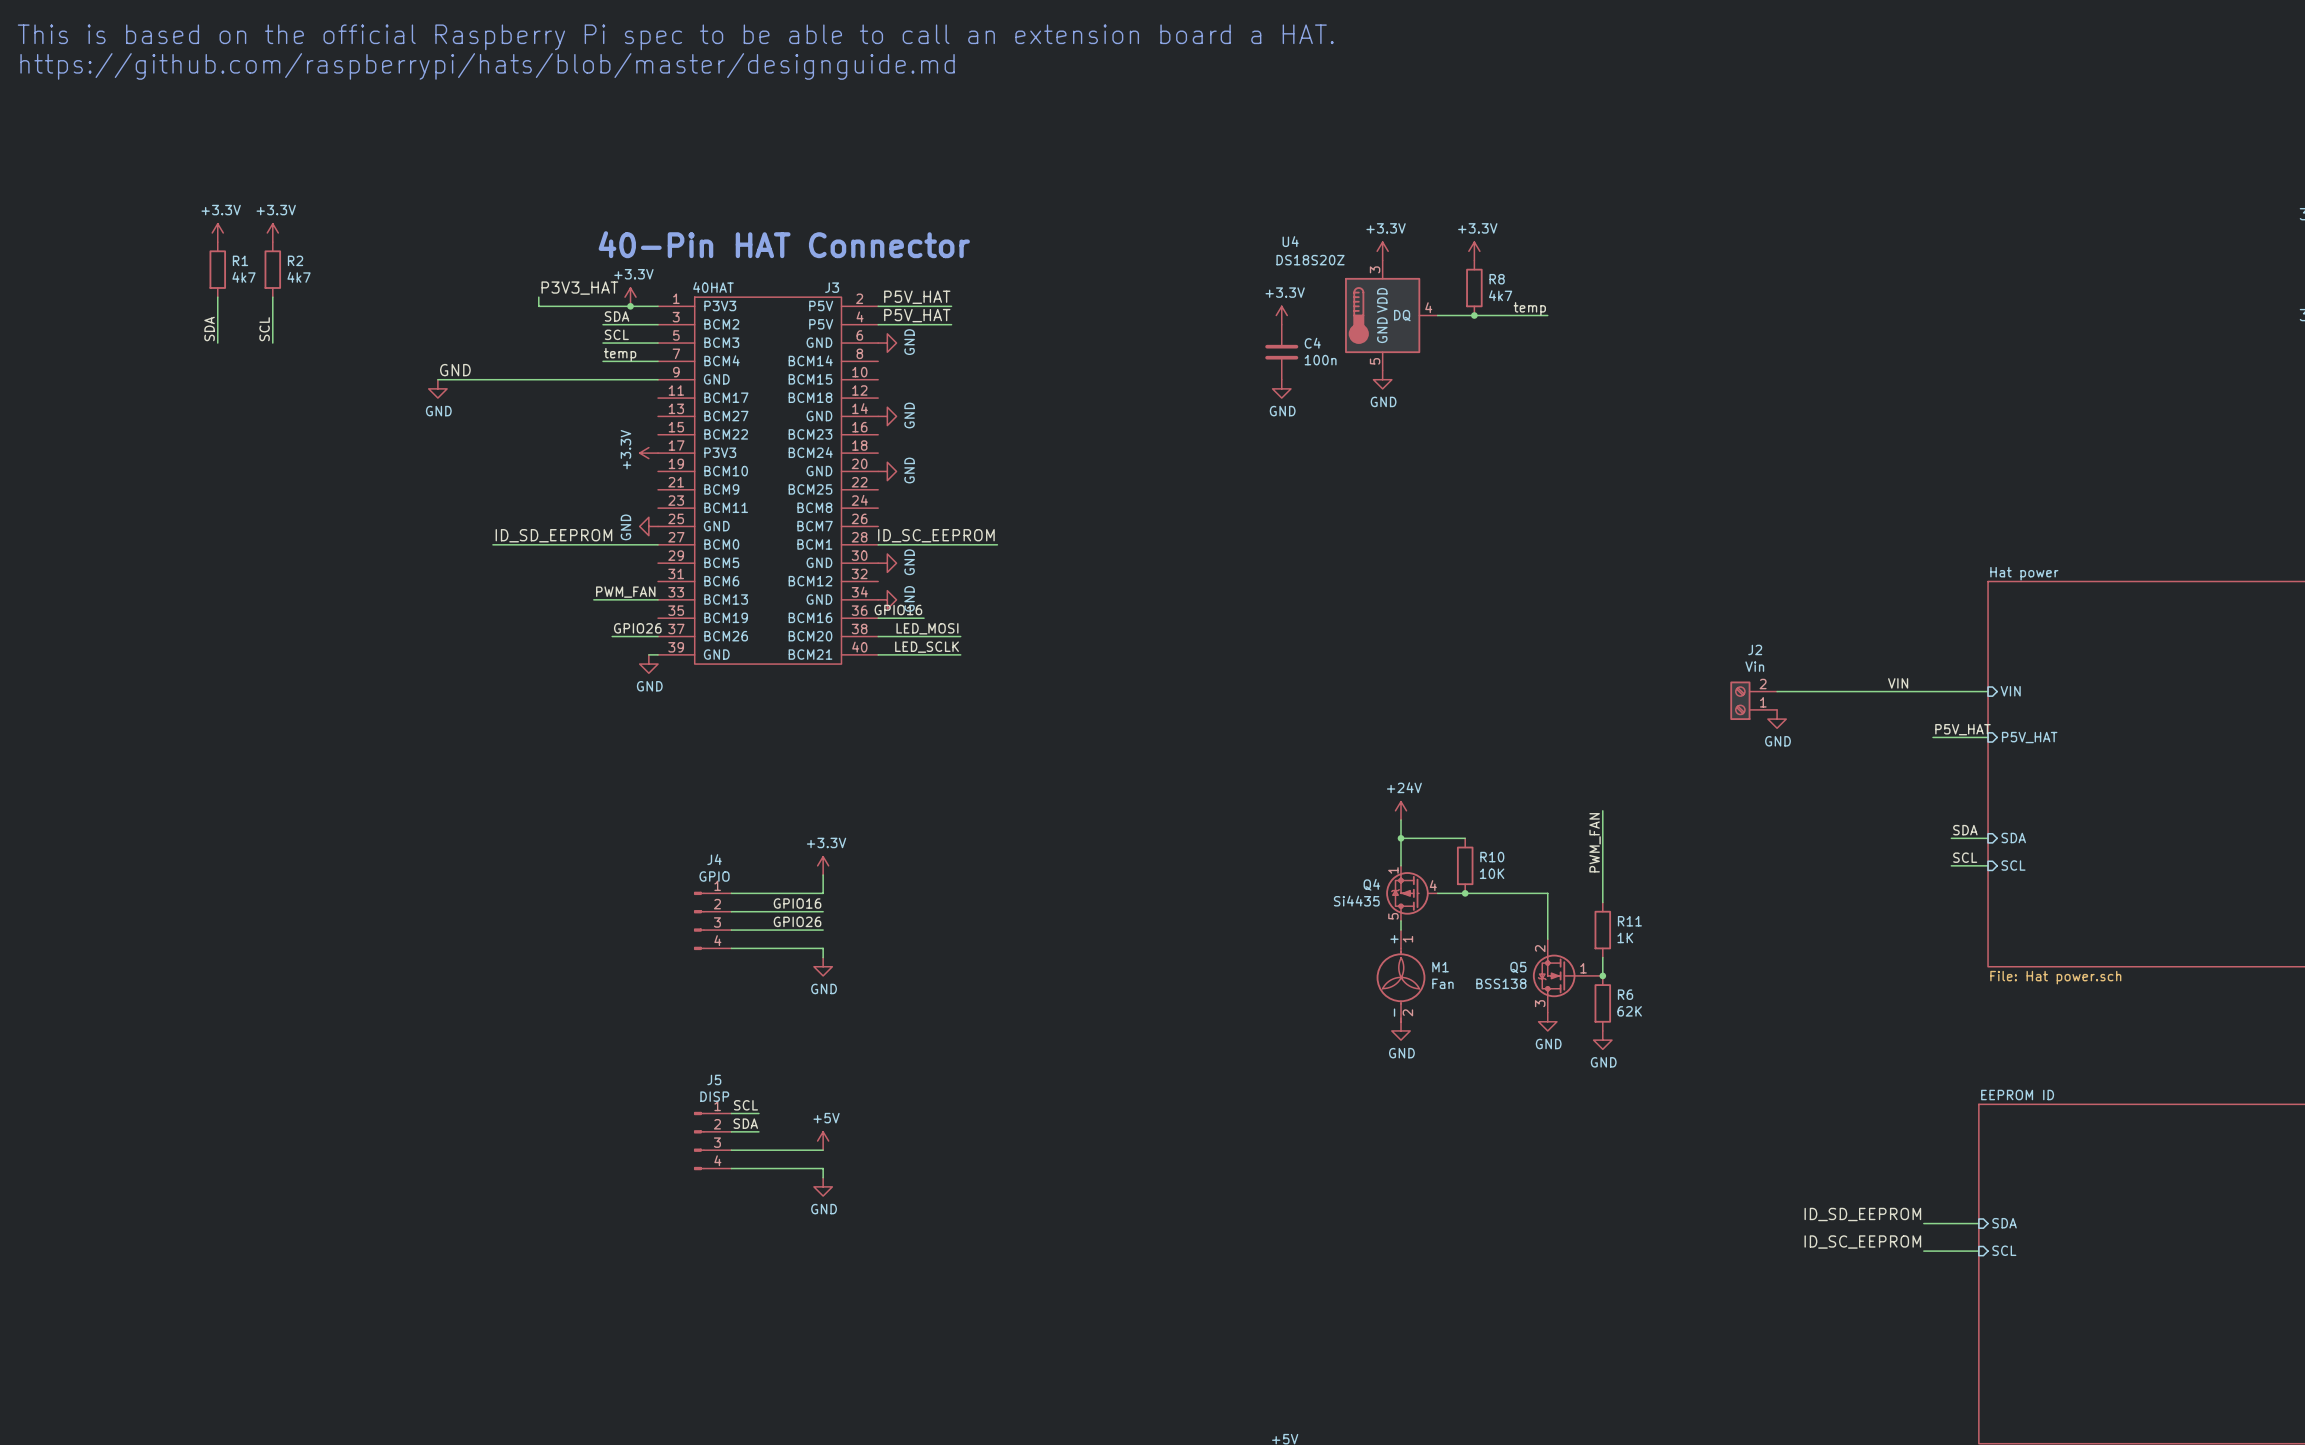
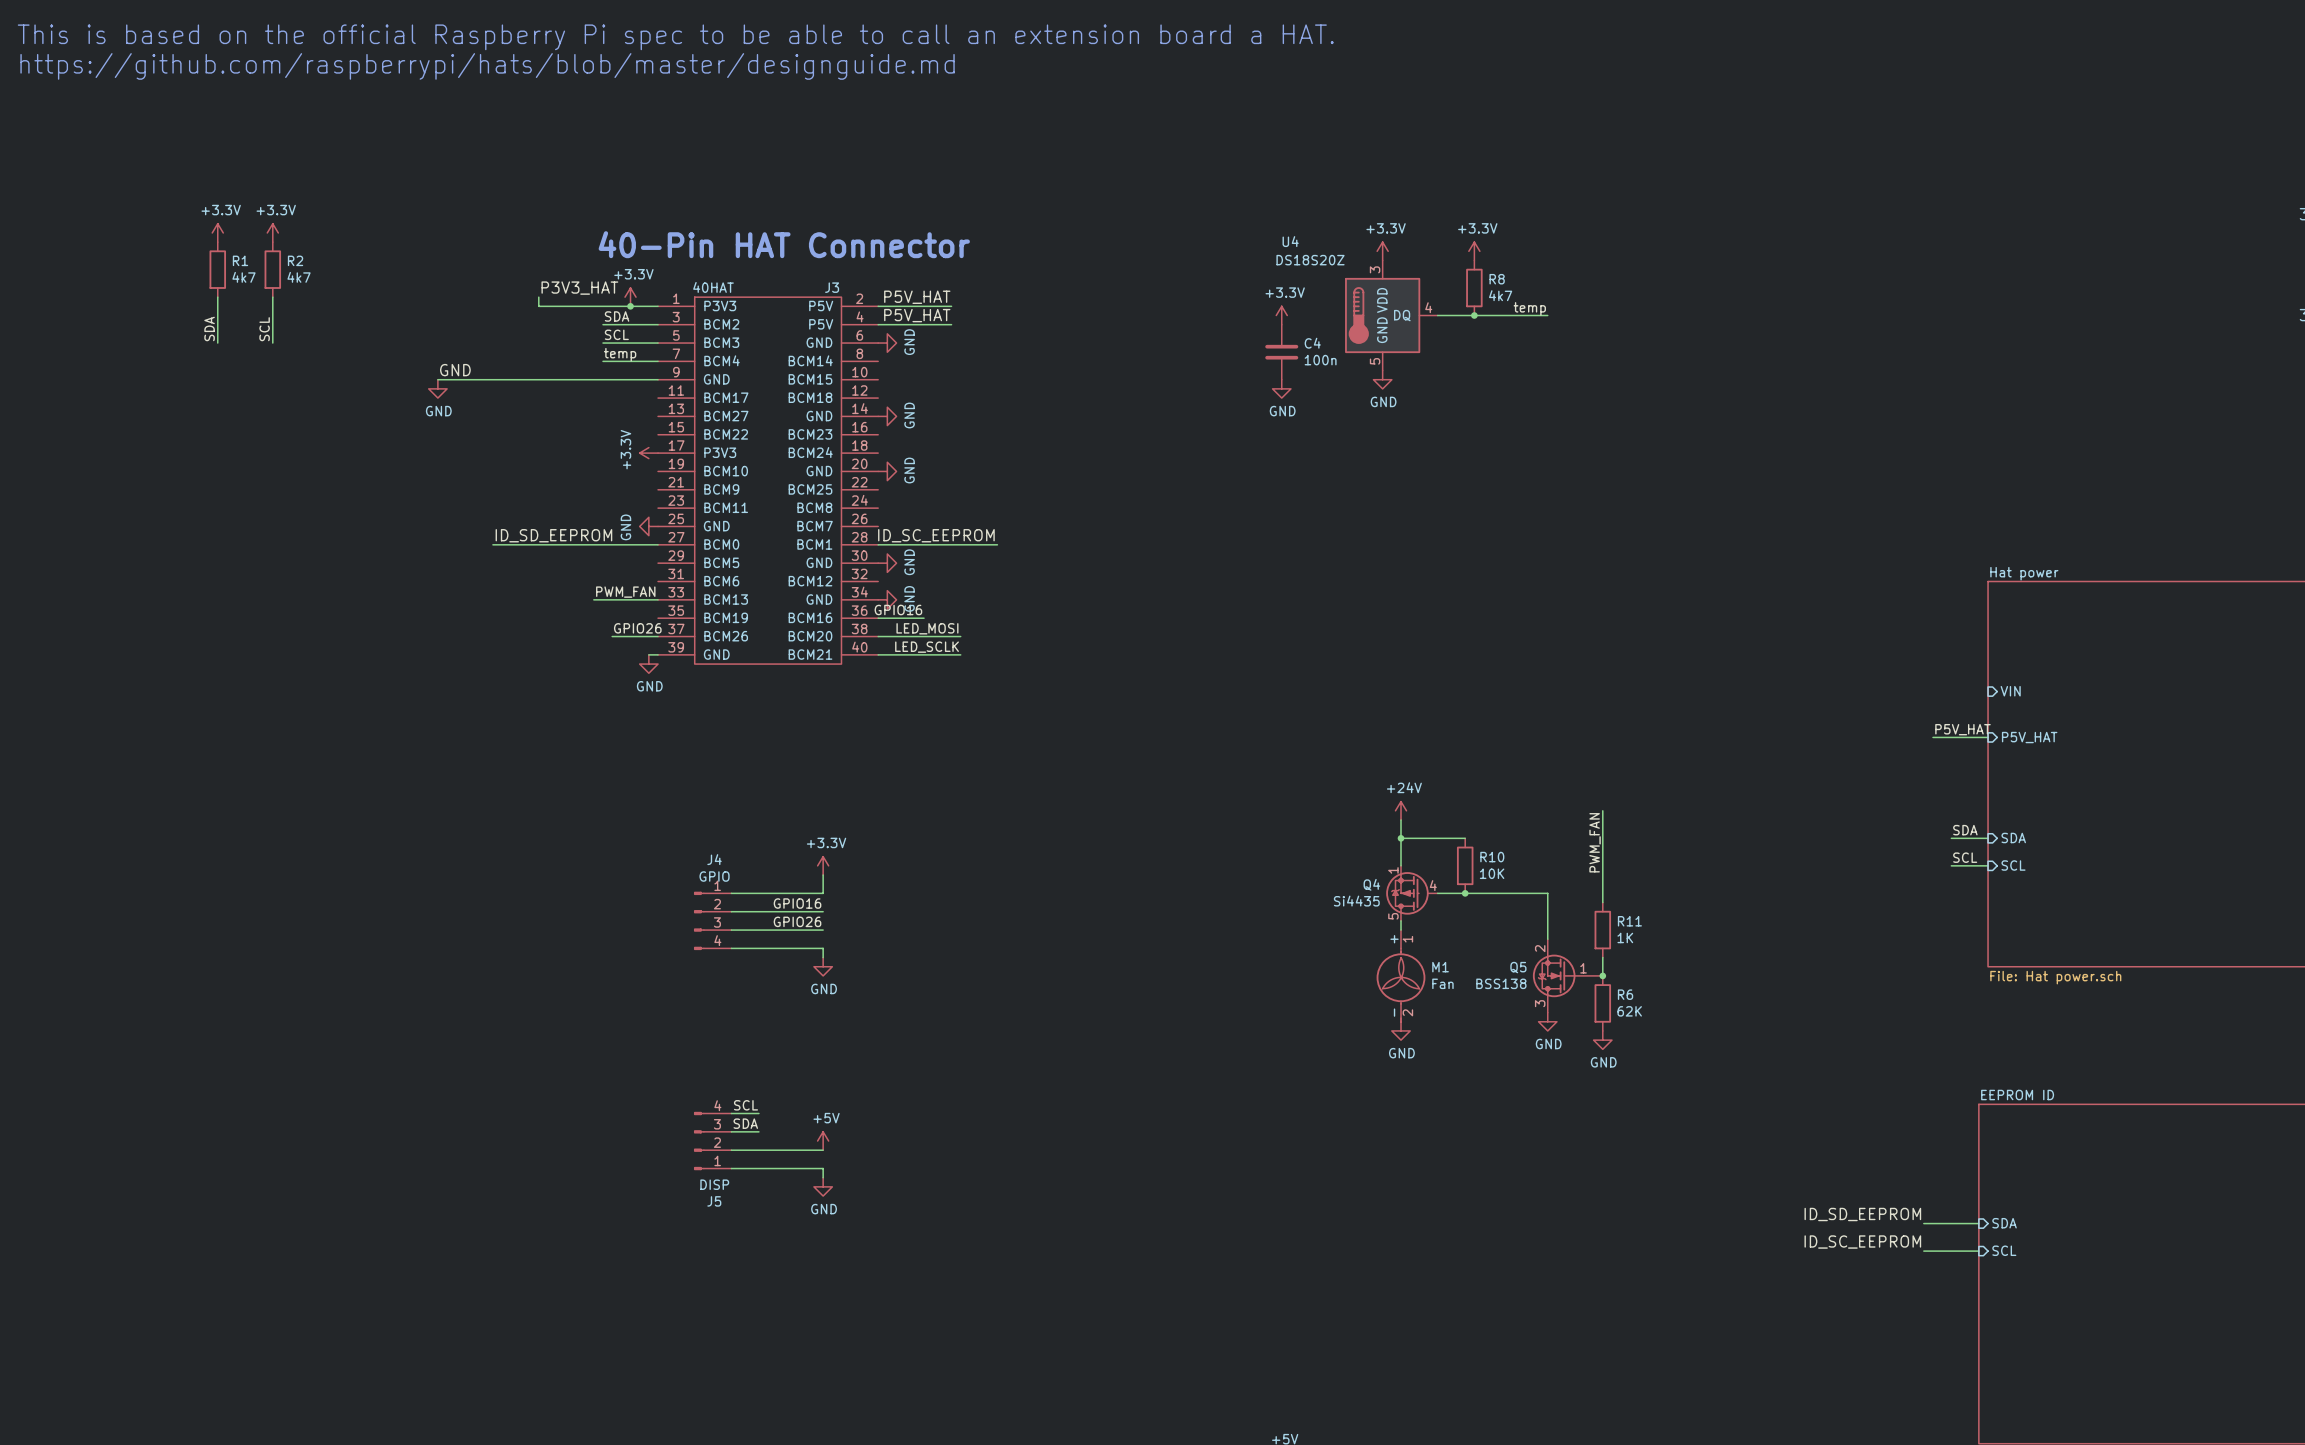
label: VIN (1898, 683) -> none
wire: (1777, 691) (1988, 691) -> none
J2: Vin (1753, 700) -> none
power symbol: GND (1777, 719) -> none
J5 flip: as is (699, 1141) -> up-down (699, 1141)

